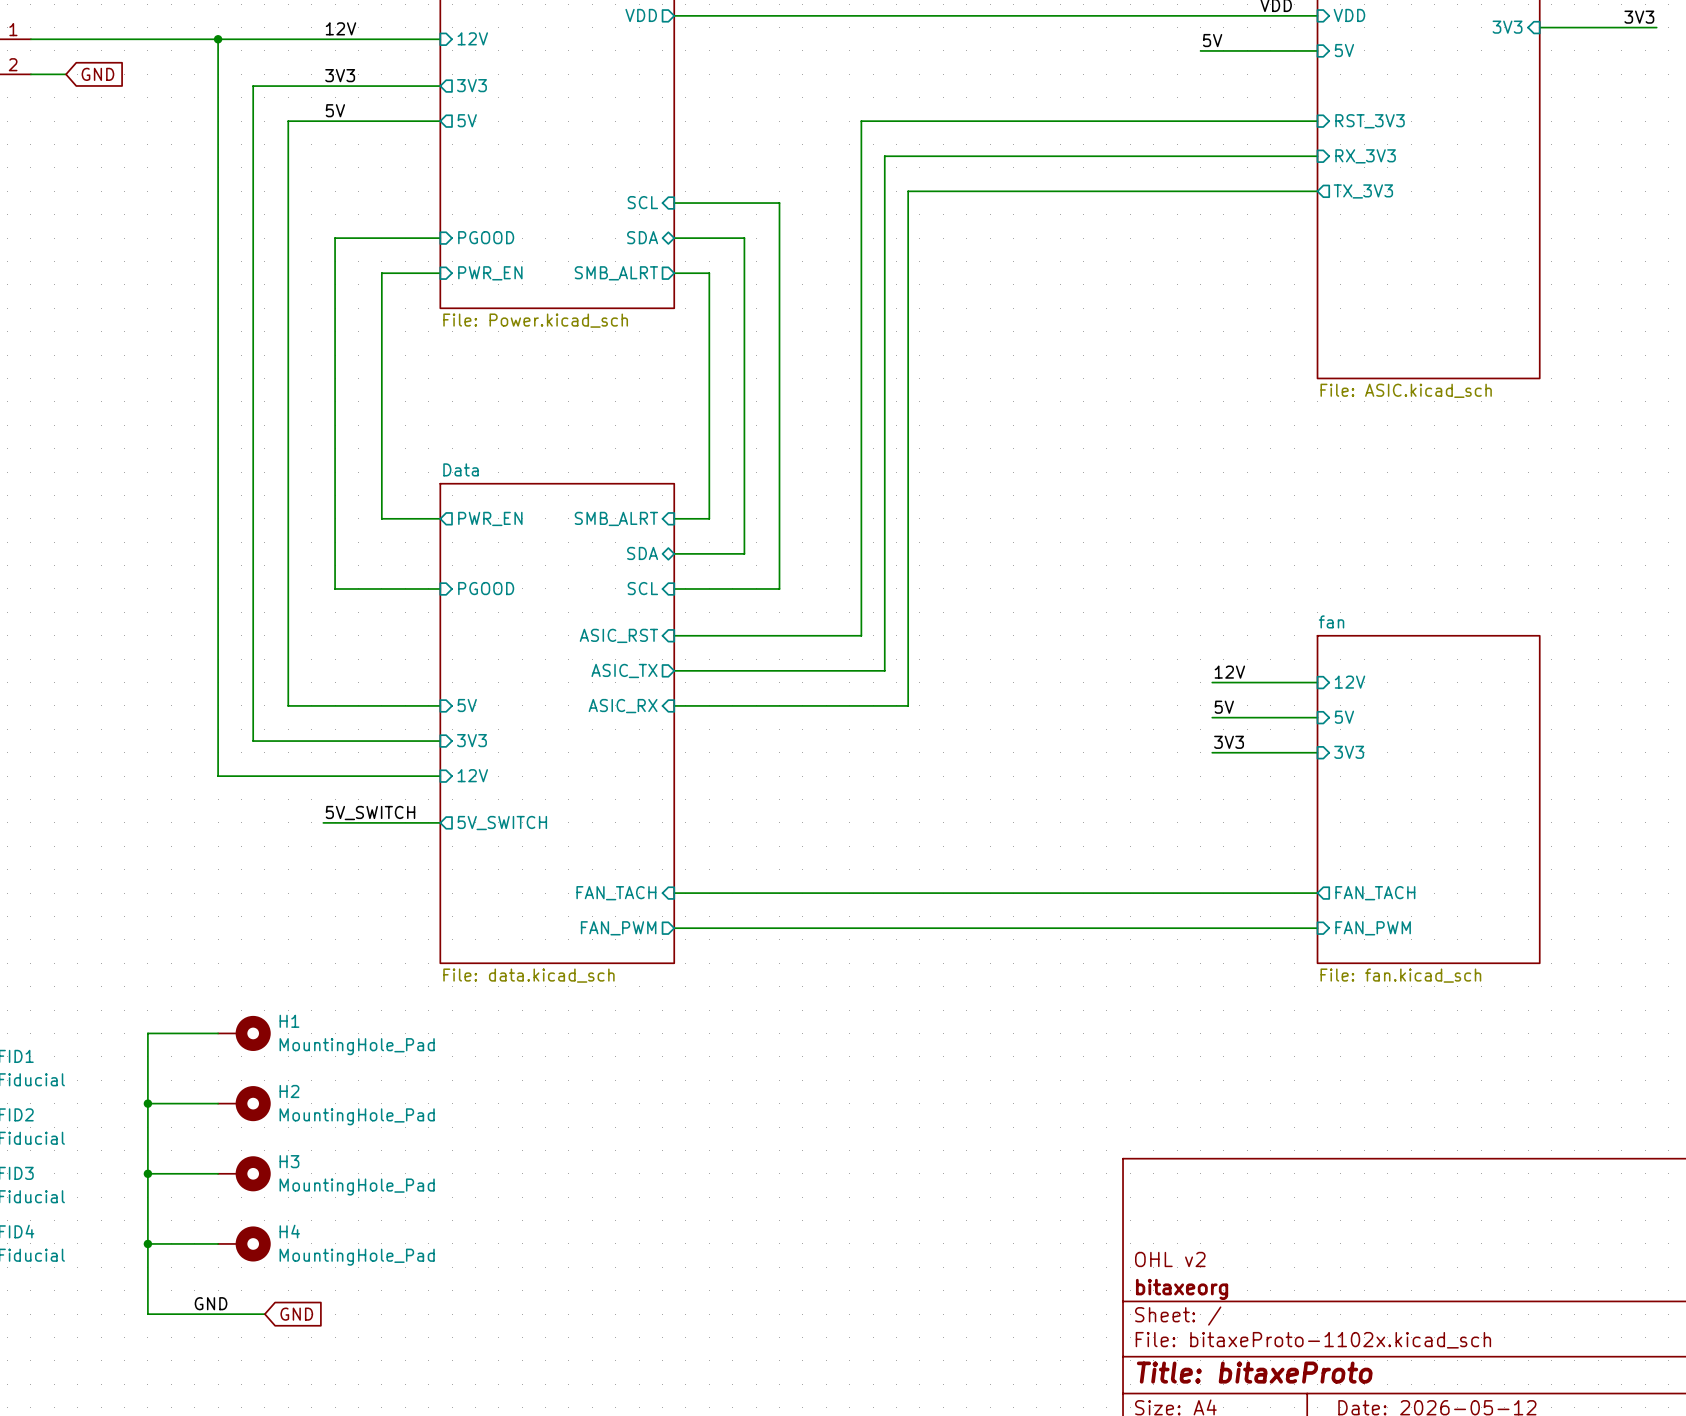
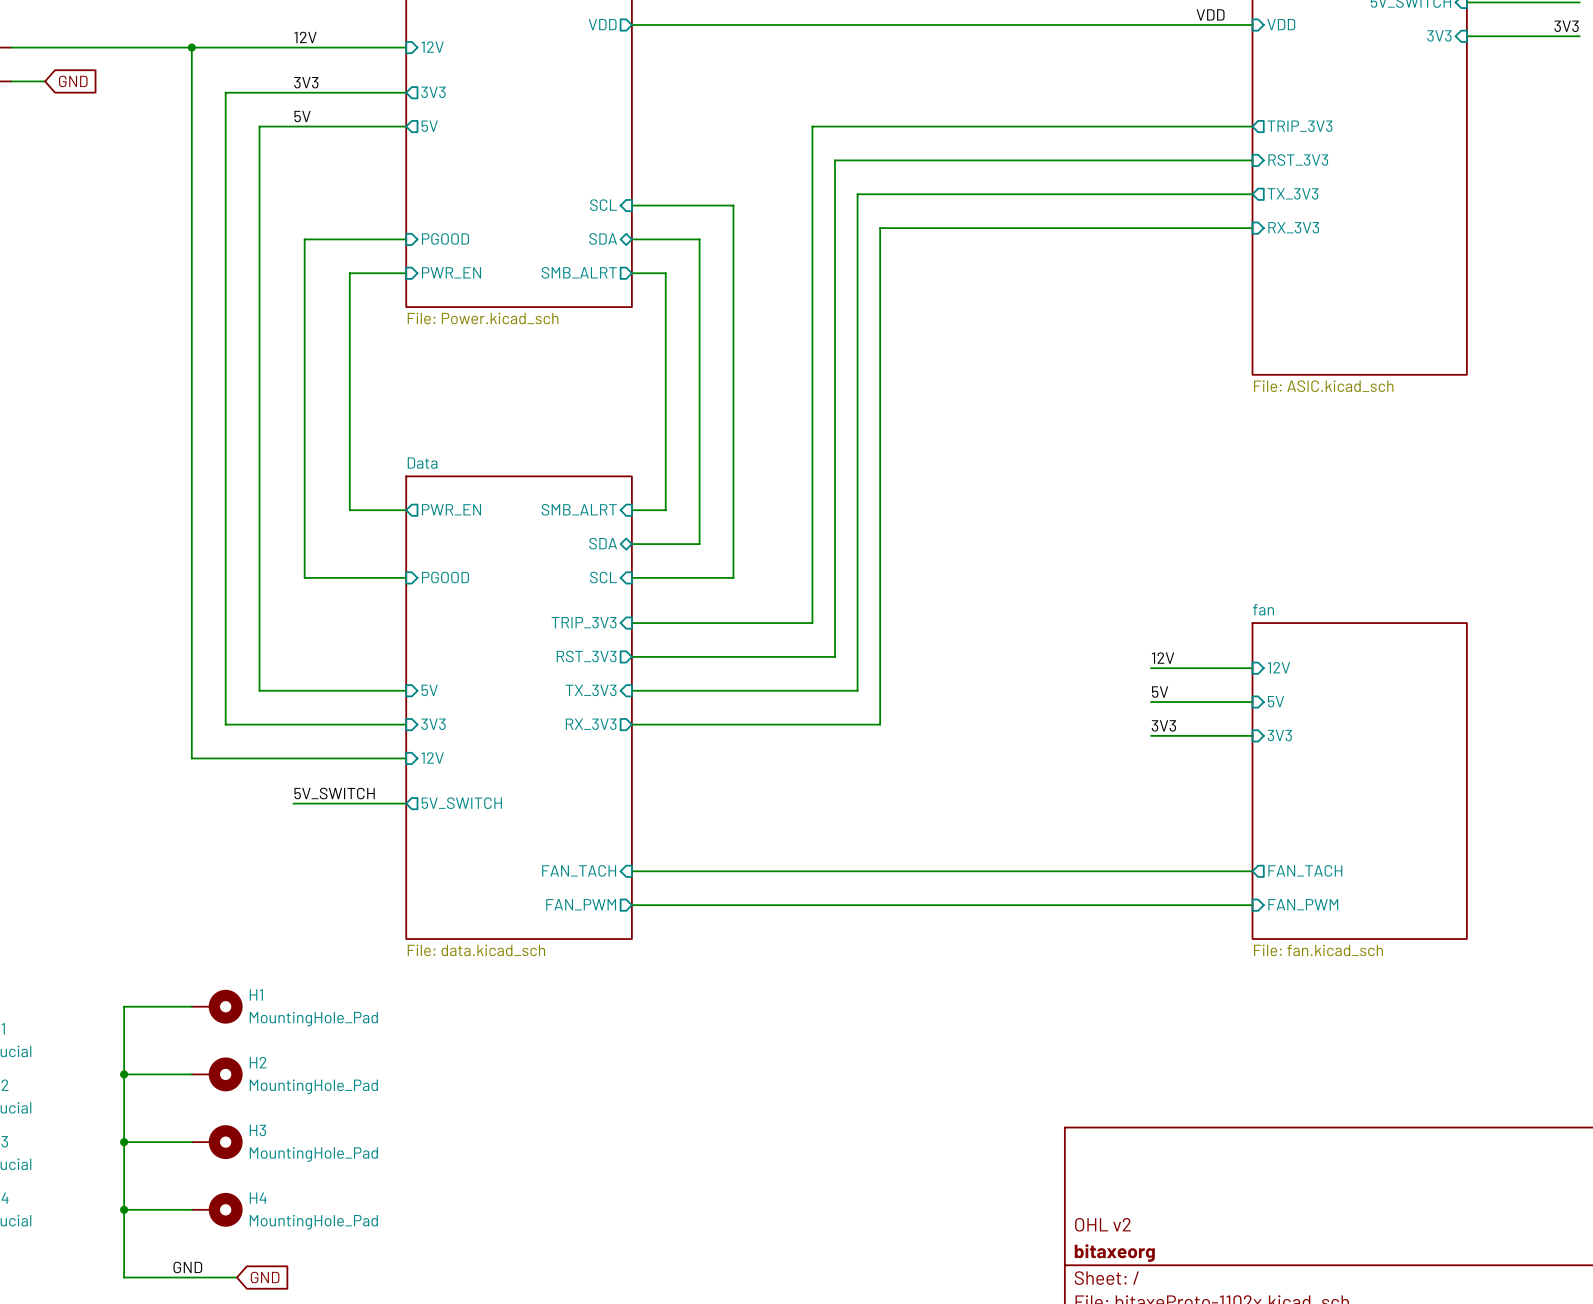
label: 5V (1212, 40) -> none
wire: (1200, 50) (1317, 50) -> none
sheet pin: 5V (1344, 50) -> none
sheet pin shape: input (1370, 121) -> output (1299, 126)
sheet pin: RST_3V3 (1370, 121) -> TRIP_3V3 (1299, 126)
sheet pin: RX_3V3 (1365, 156) -> RST_3V3 (1298, 159)
wire: none -> (1252, 228) (880, 228) (880, 724) (631, 724)
sheet pin: none -> RX_3V3 (1293, 227)
sheet pin: ASIC_RST (618, 635) -> TRIP_3V3 (584, 622)
sheet pin: ASIC_TX (624, 670) -> RST_3V3 (586, 656)
sheet pin: ASIC_RX (623, 706) -> TX_3V3 (591, 690)
sheet pin: none -> RX_3V3 (591, 724)

